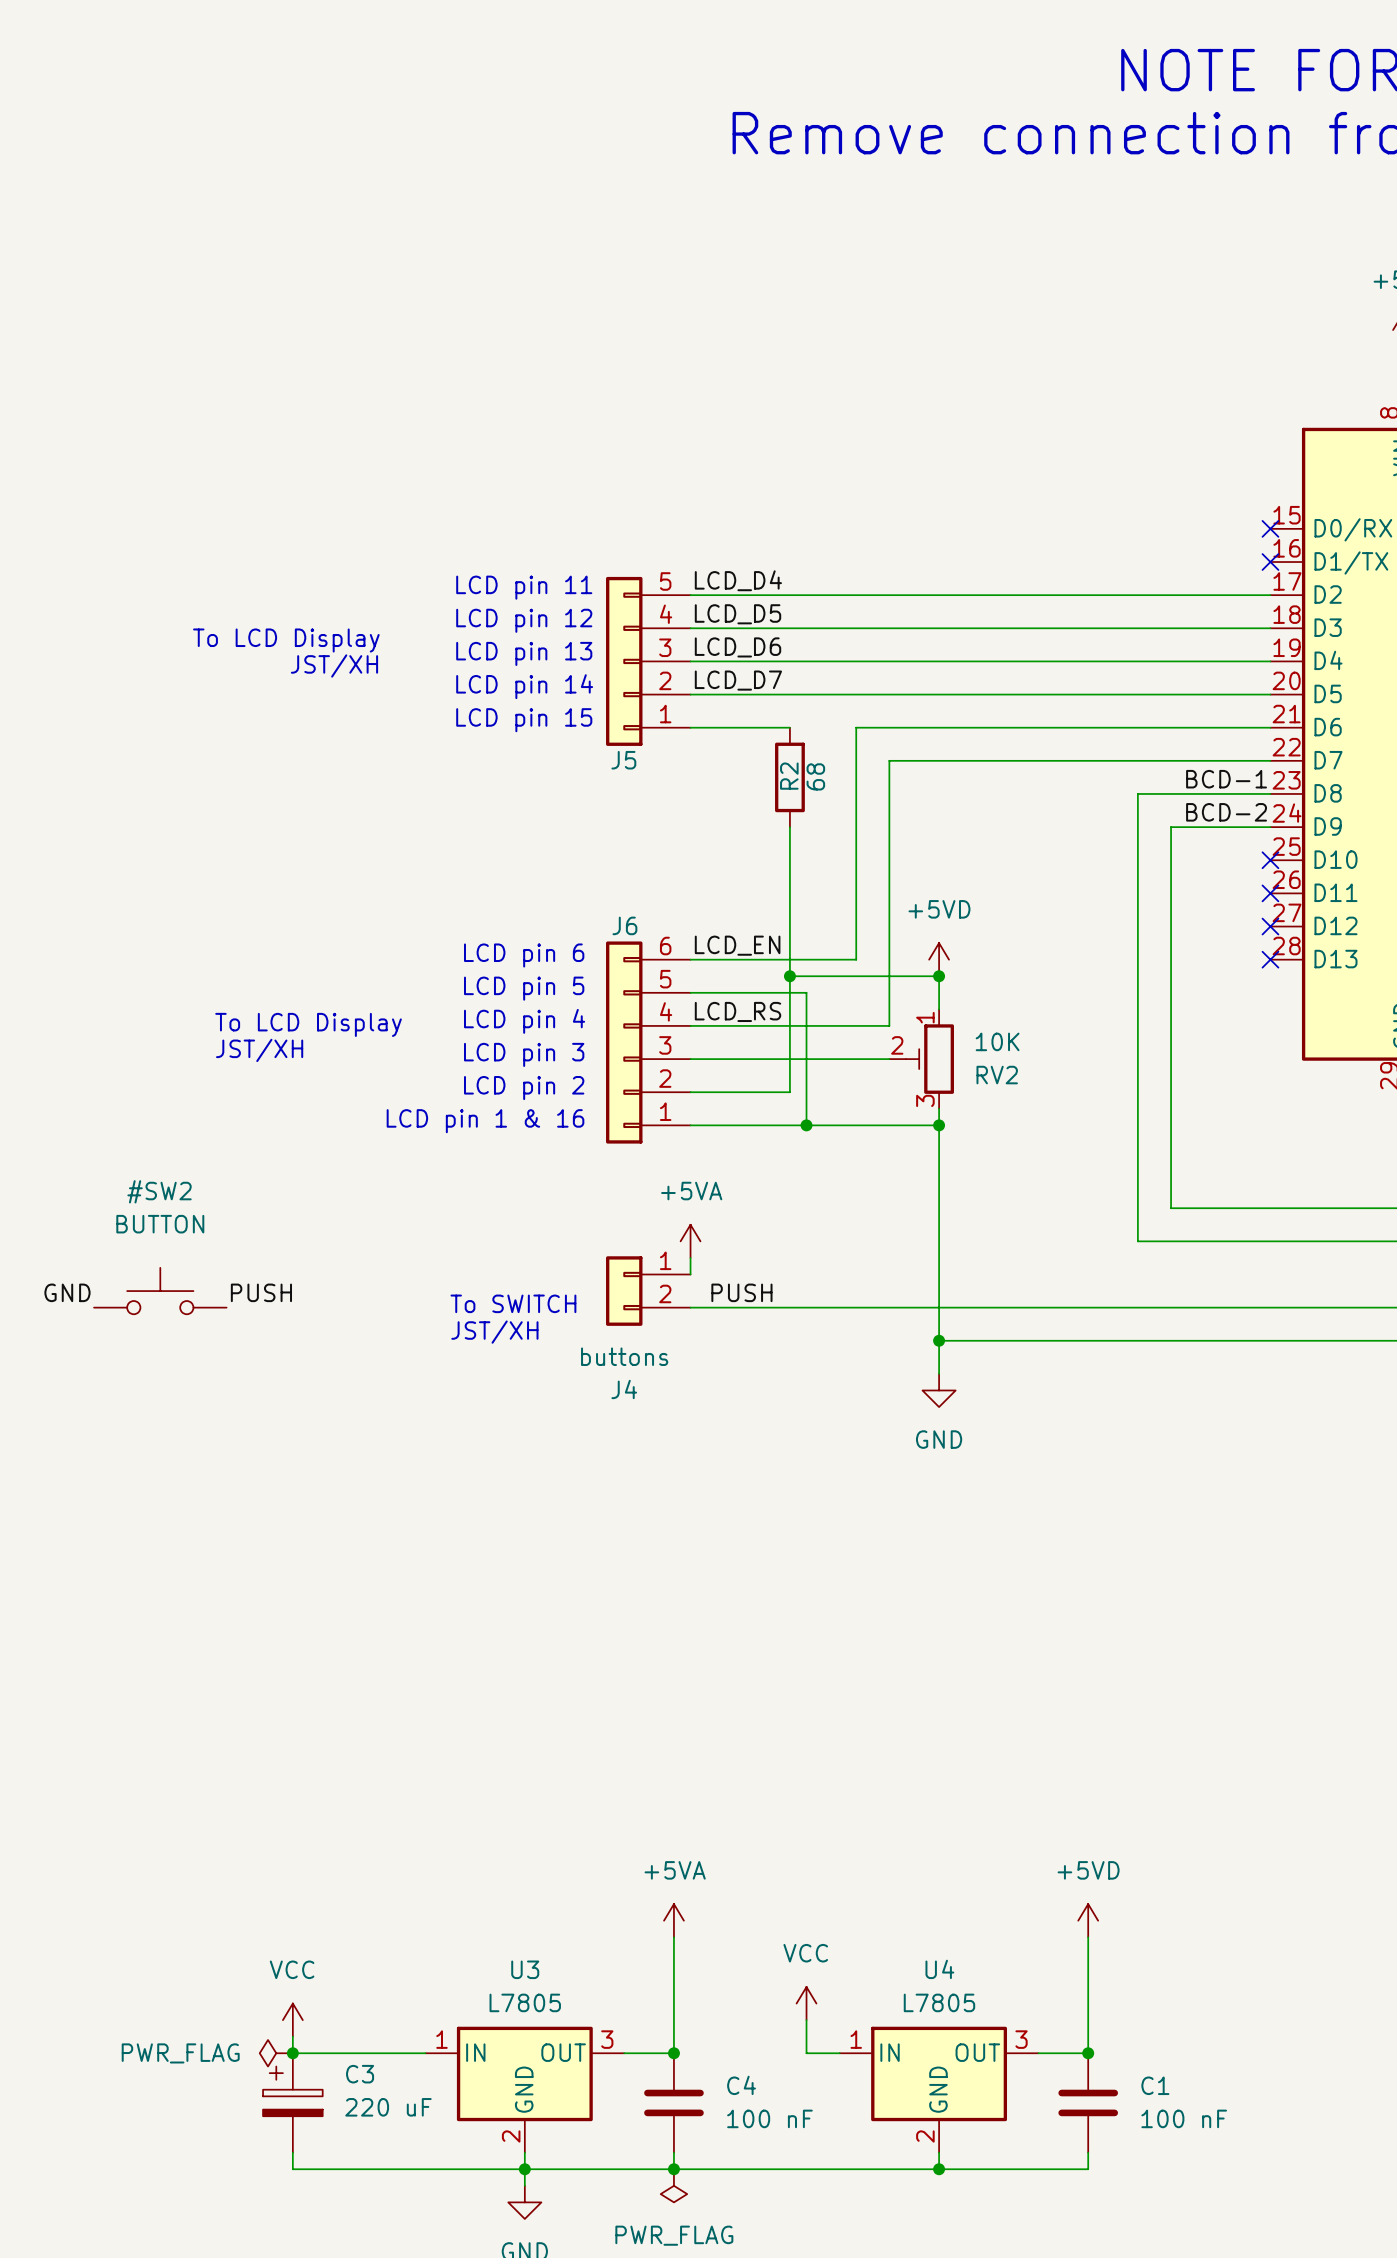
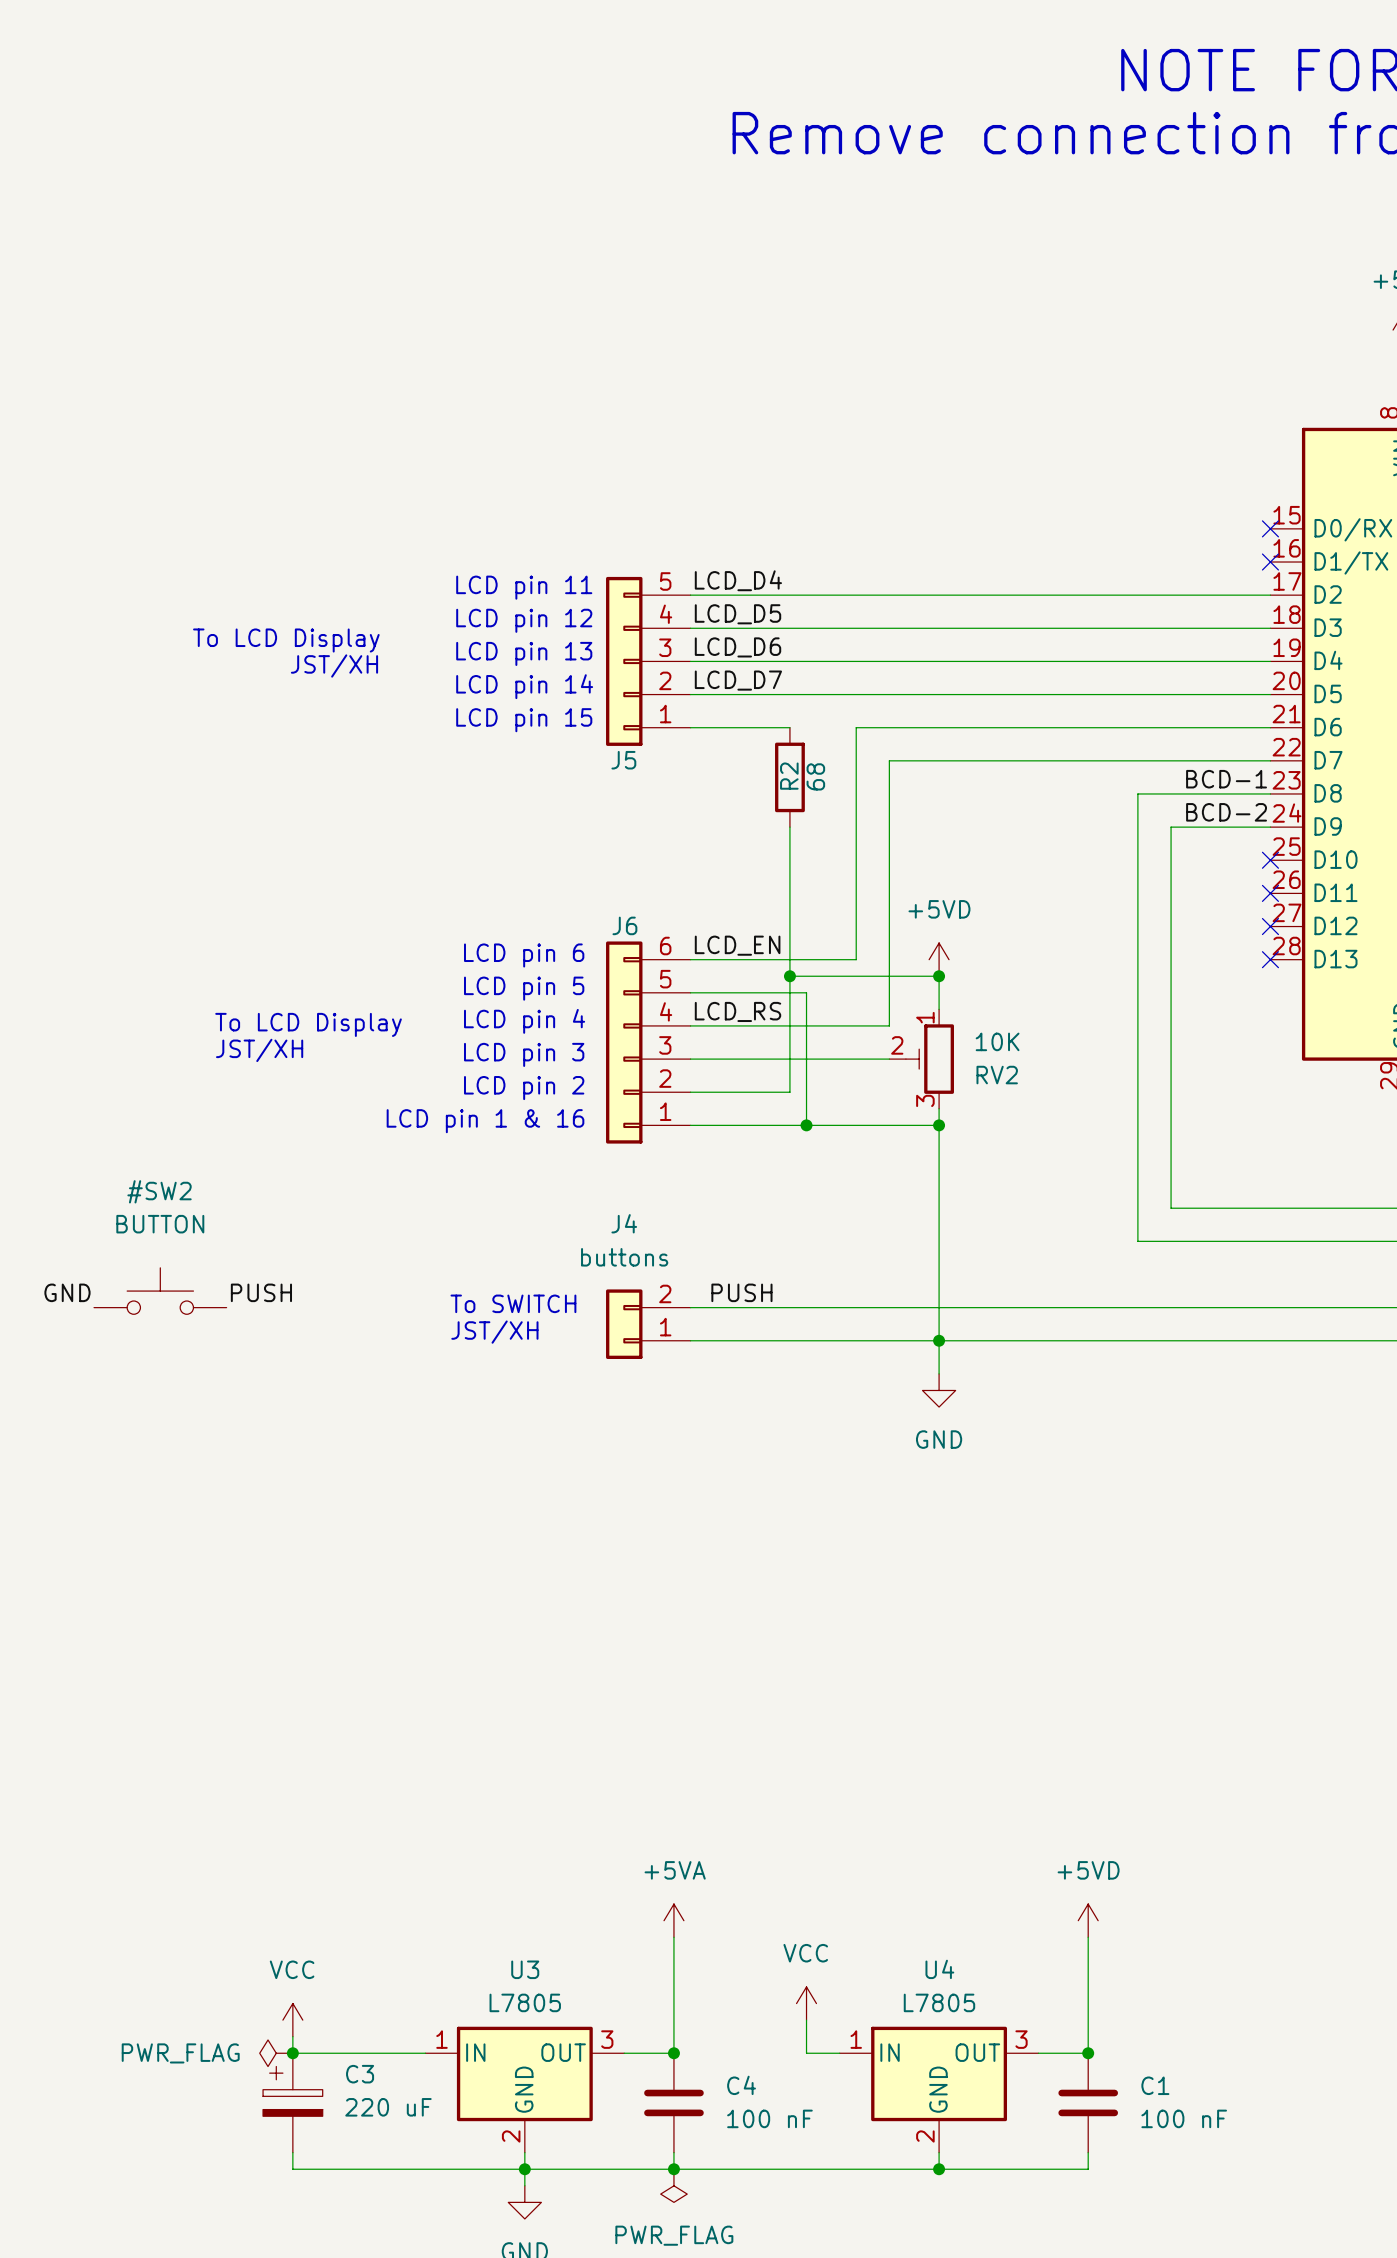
power symbol: +5VA (690, 1241) -> none
wire: (690, 1257) (690, 1274) -> none
J4 flip: as is (624, 1291) -> up-down (624, 1324)
wire: none -> (690, 1340) (939, 1340)

